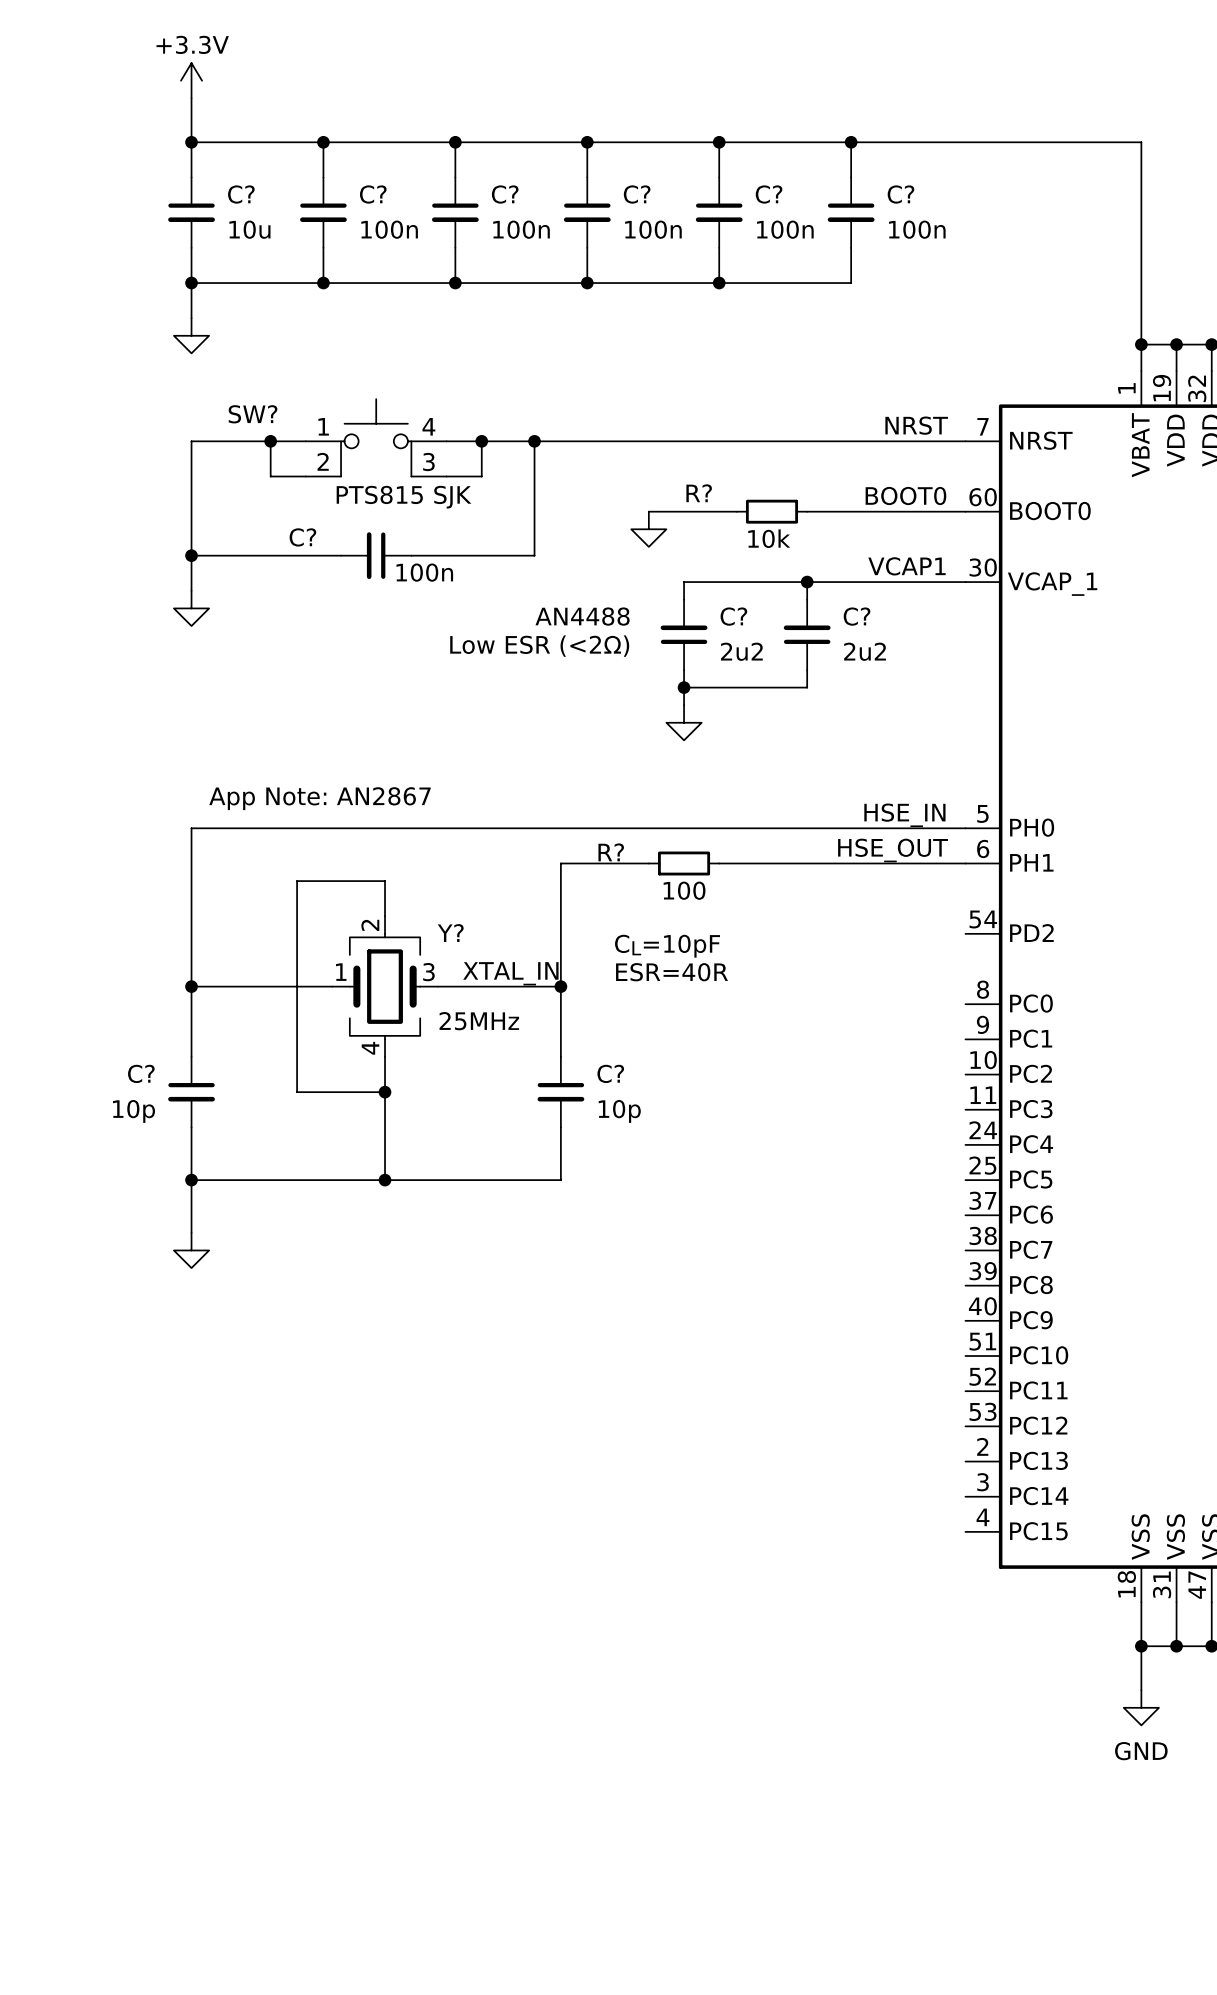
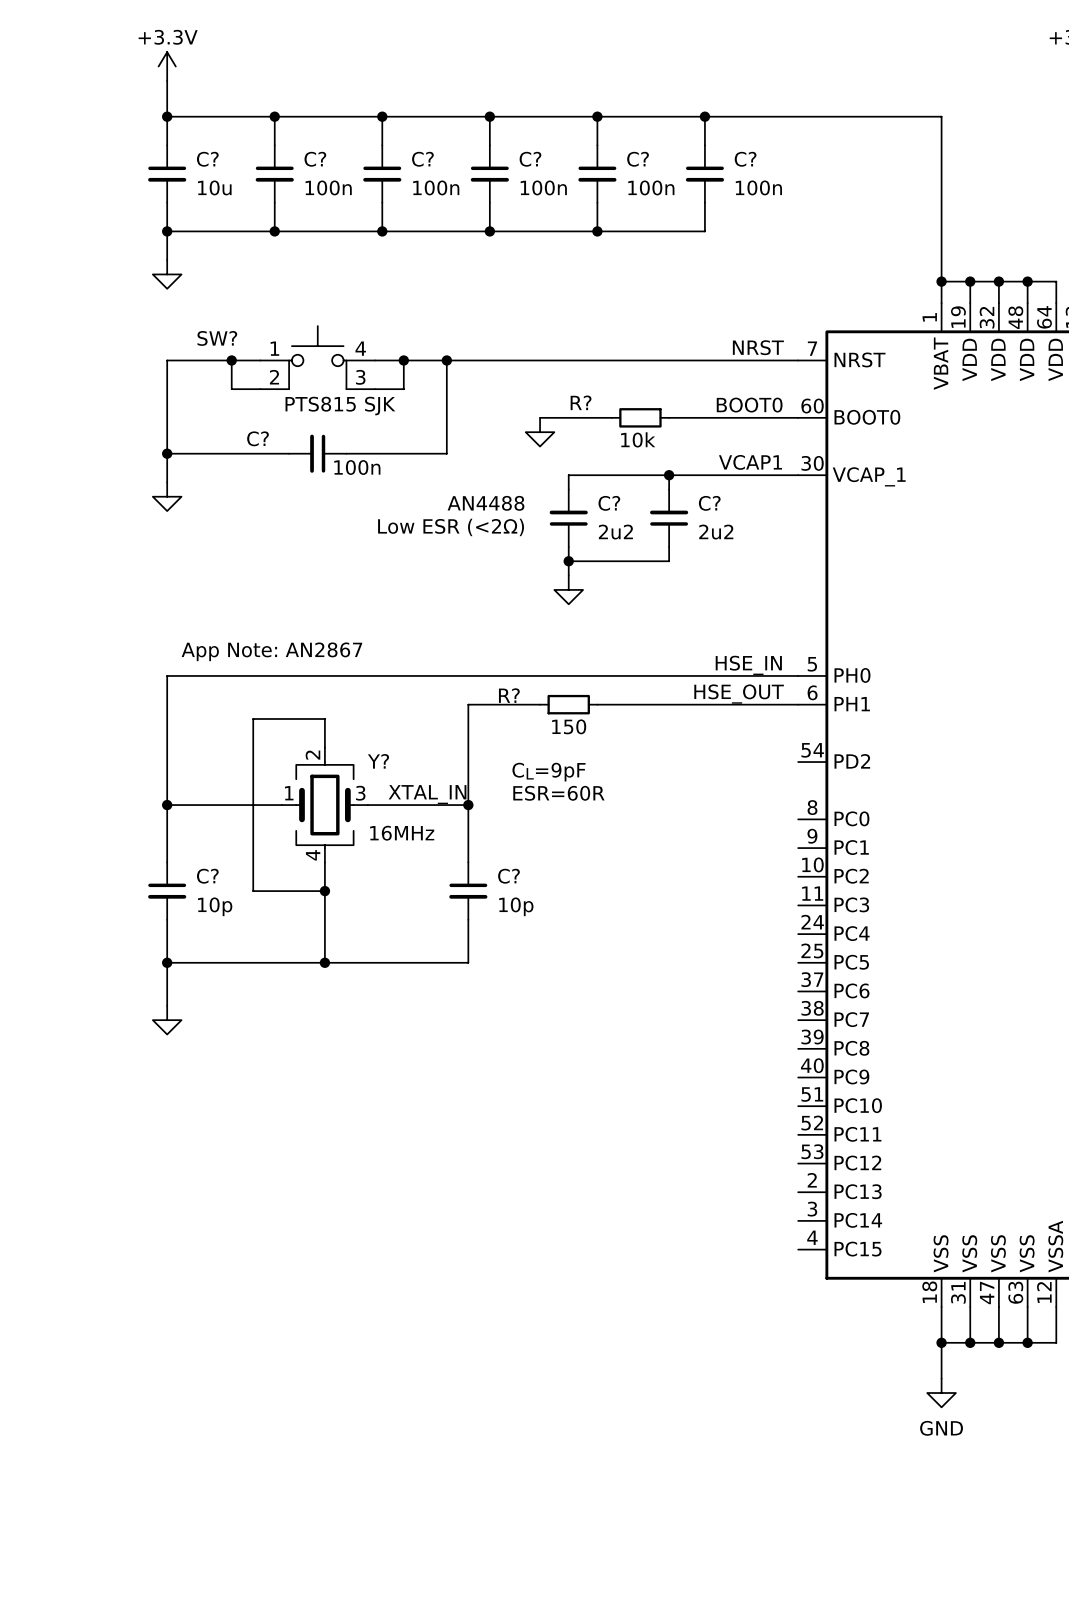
R? value: 100 (684, 890) -> 150 (569, 726)
text: CL=10pF (667, 946) -> CL=9pF (548, 772)
text: ESR=40R (672, 972) -> ESR=60R (558, 793)
Y? value: 25MHz (479, 1021) -> 16MHz (402, 833)
C? name position: C? (141, 1073) -> C? (207, 876)
C? value position: 10p (134, 1111) -> 10p (215, 906)

